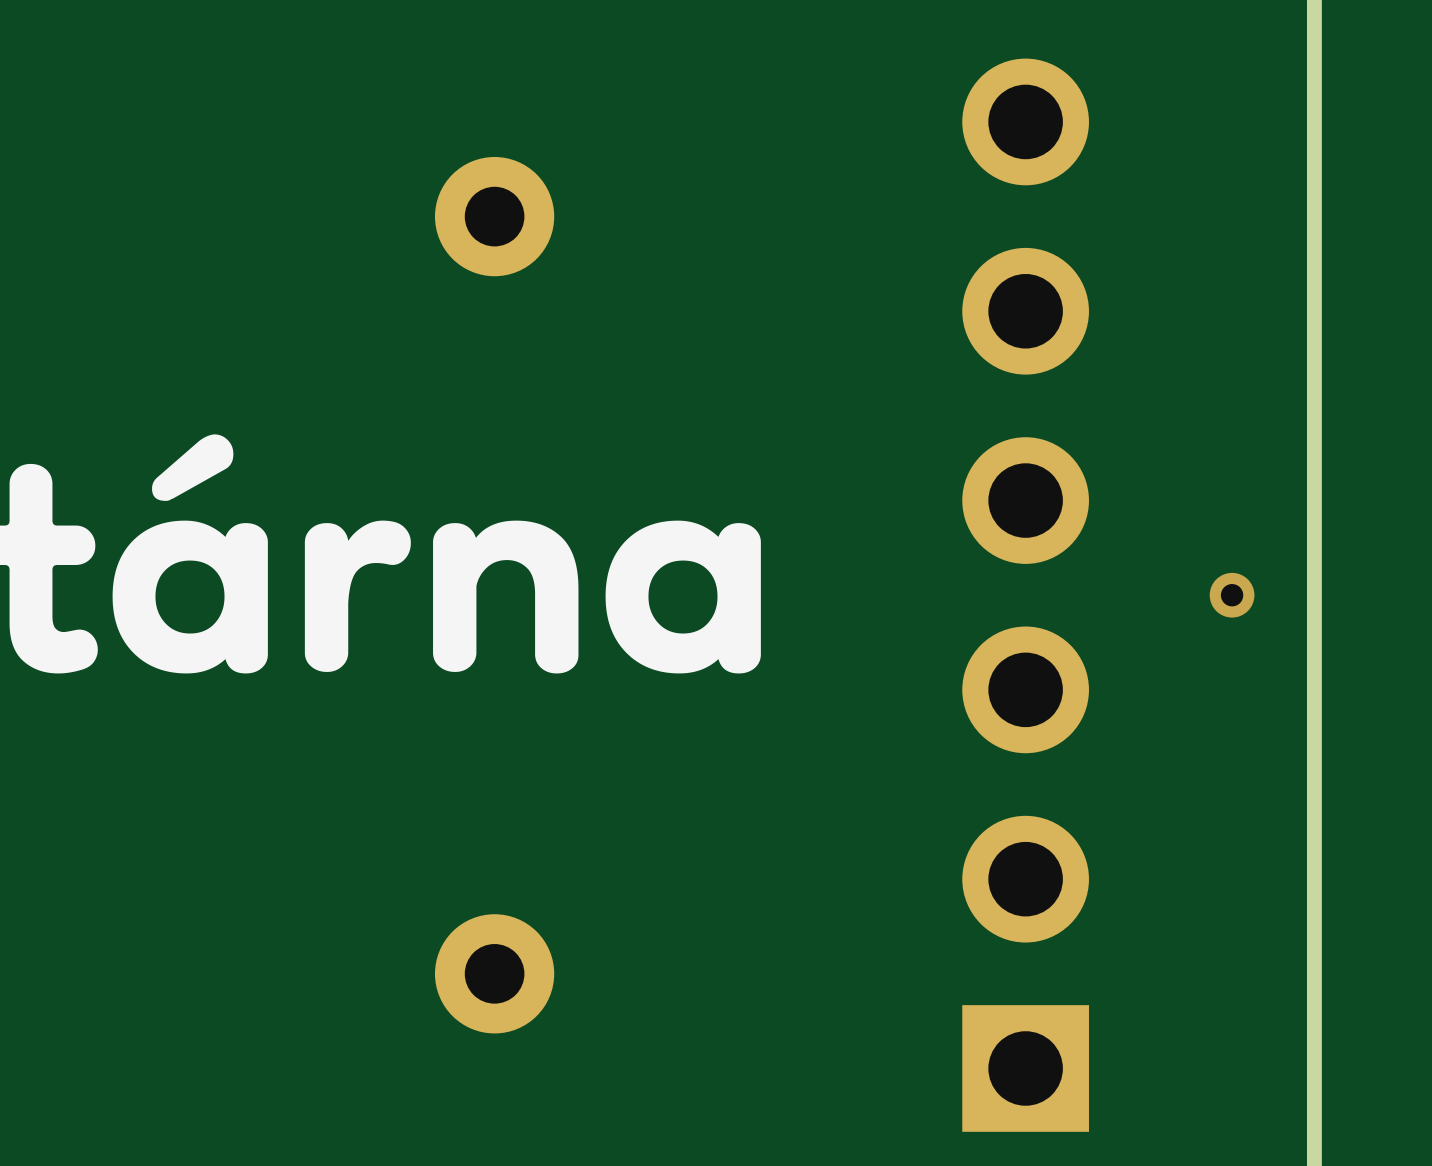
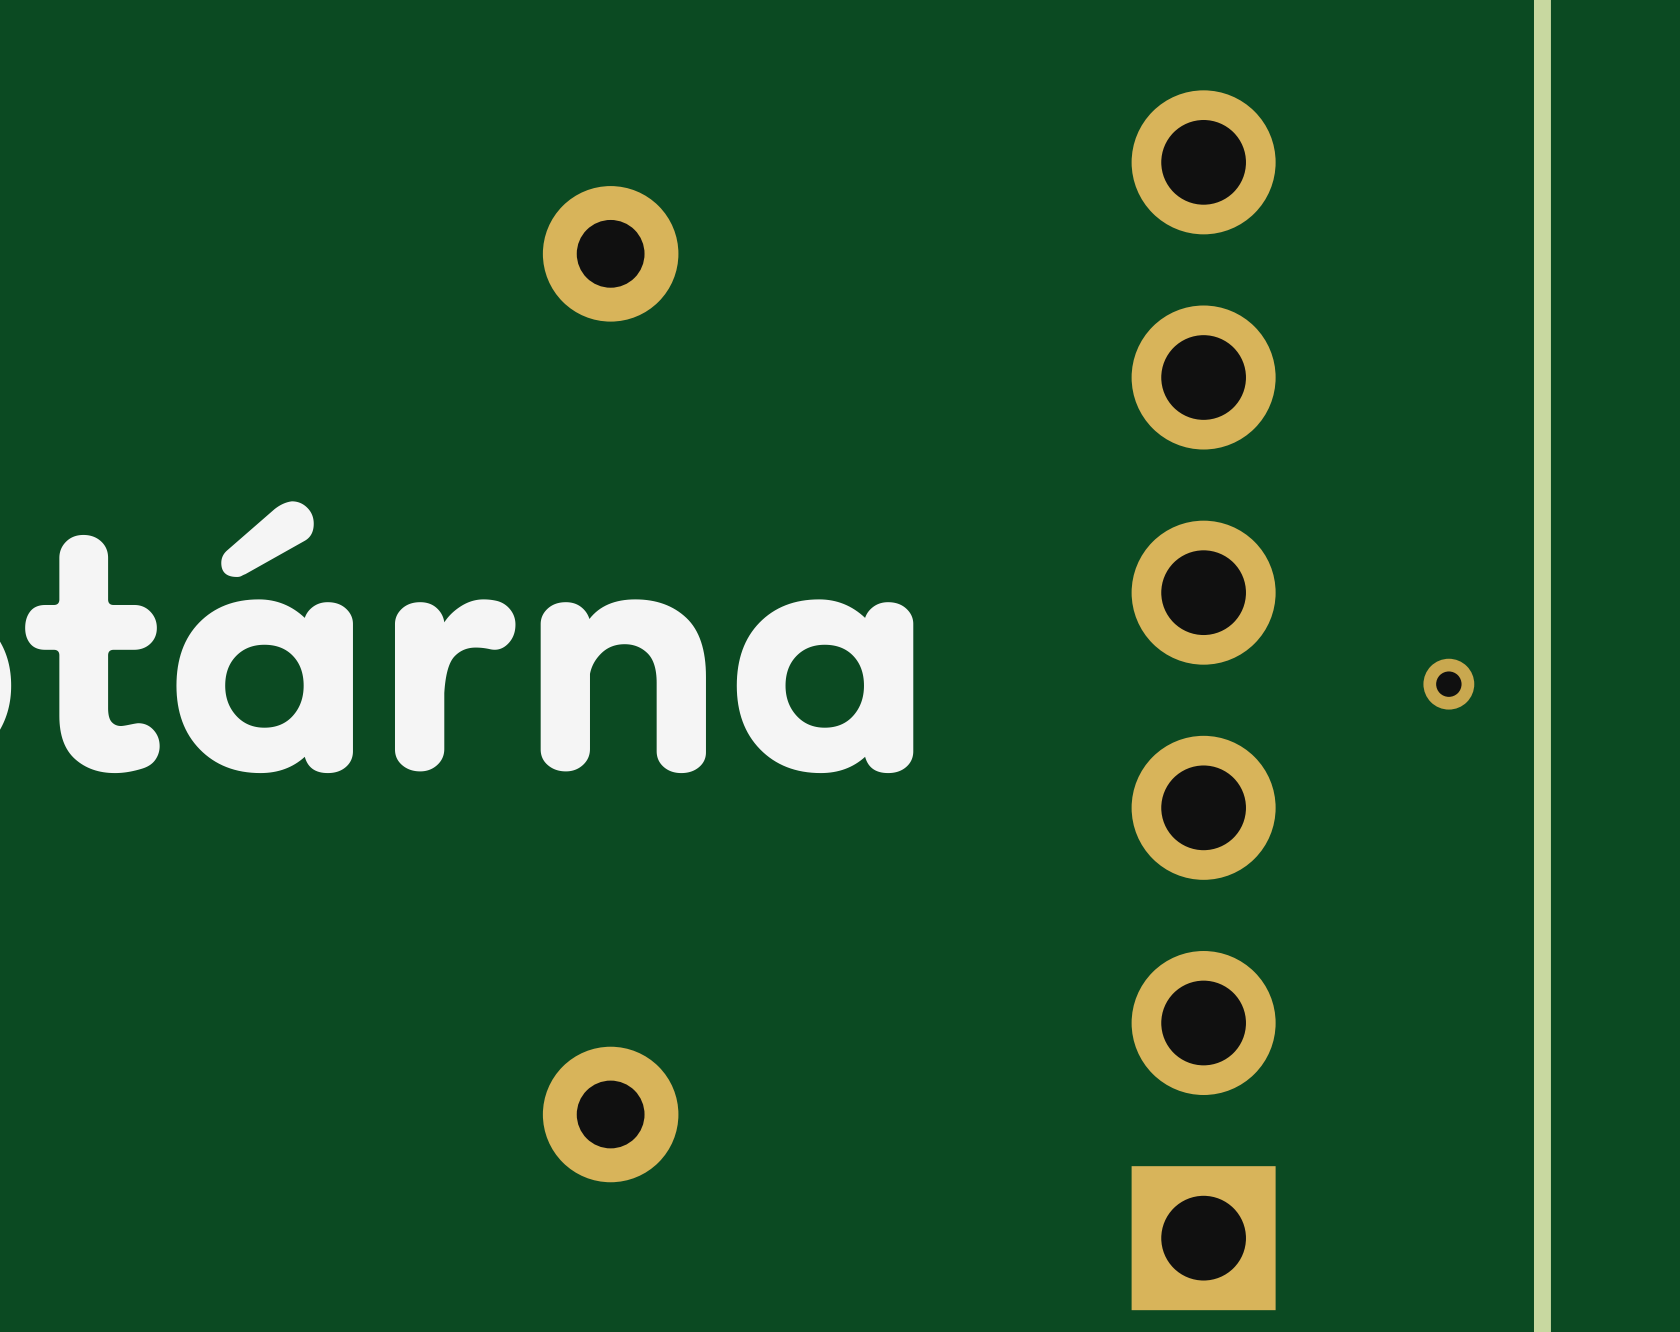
part position: (1025, 595) -> (1203, 700)

